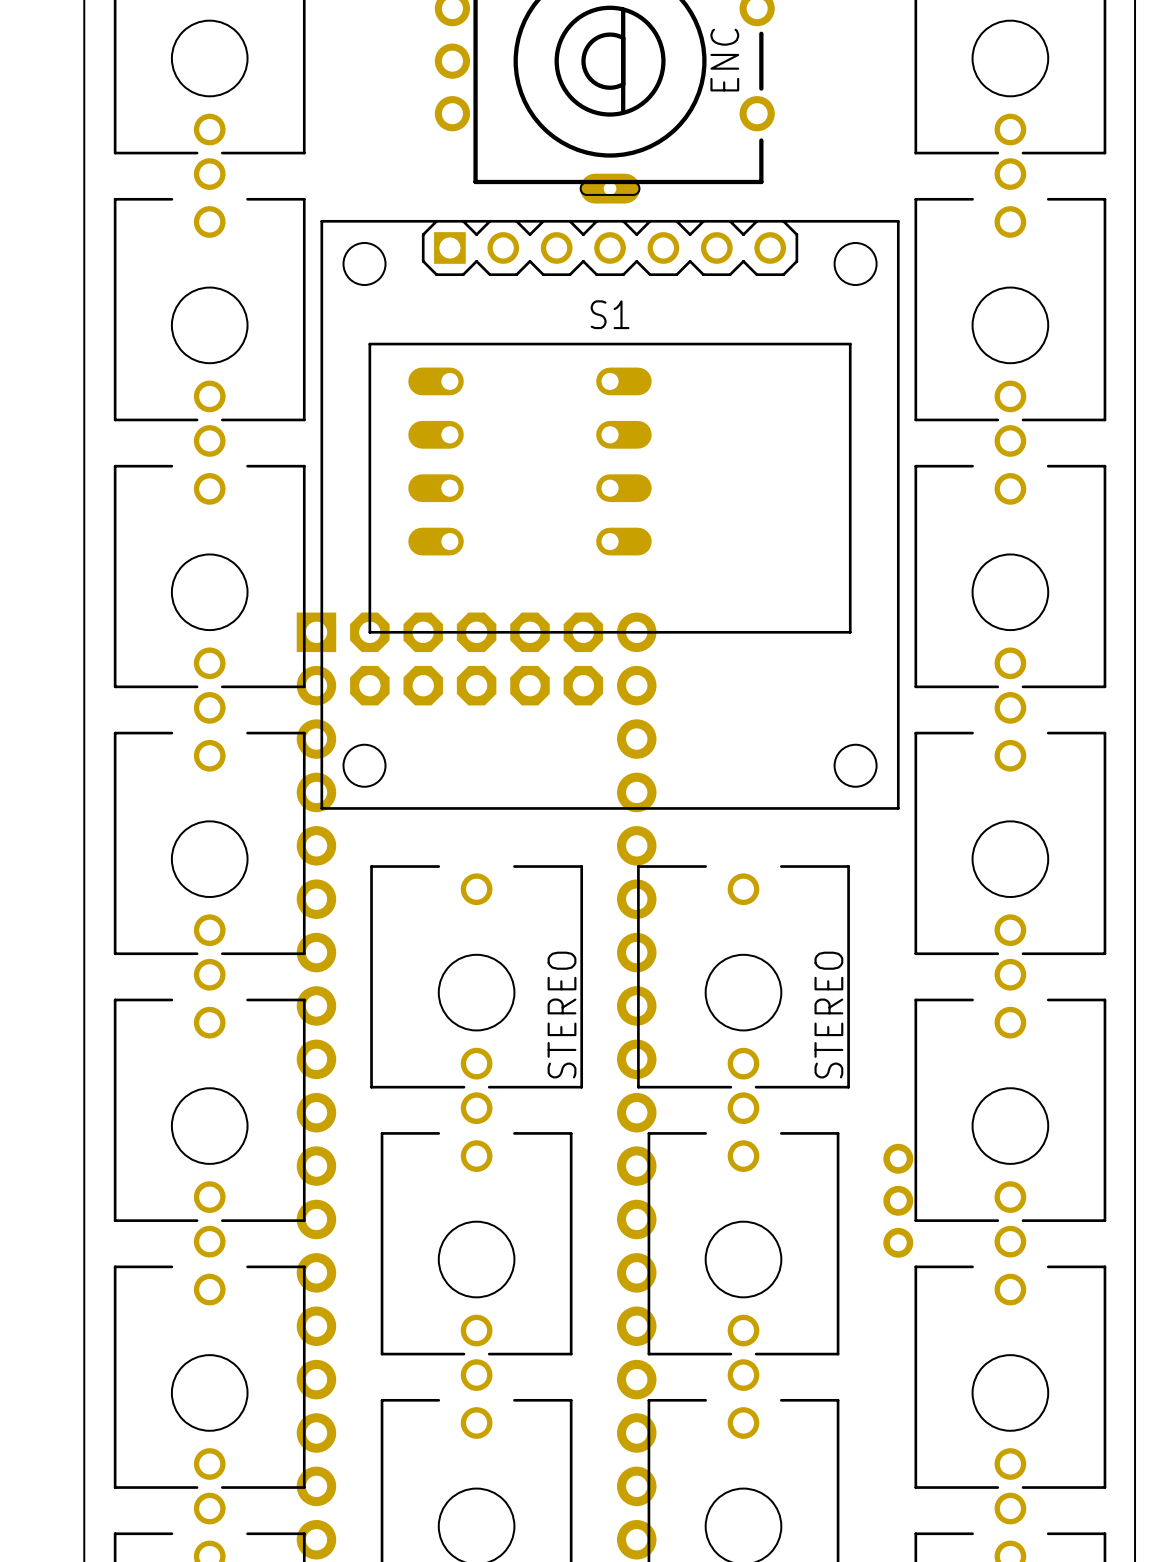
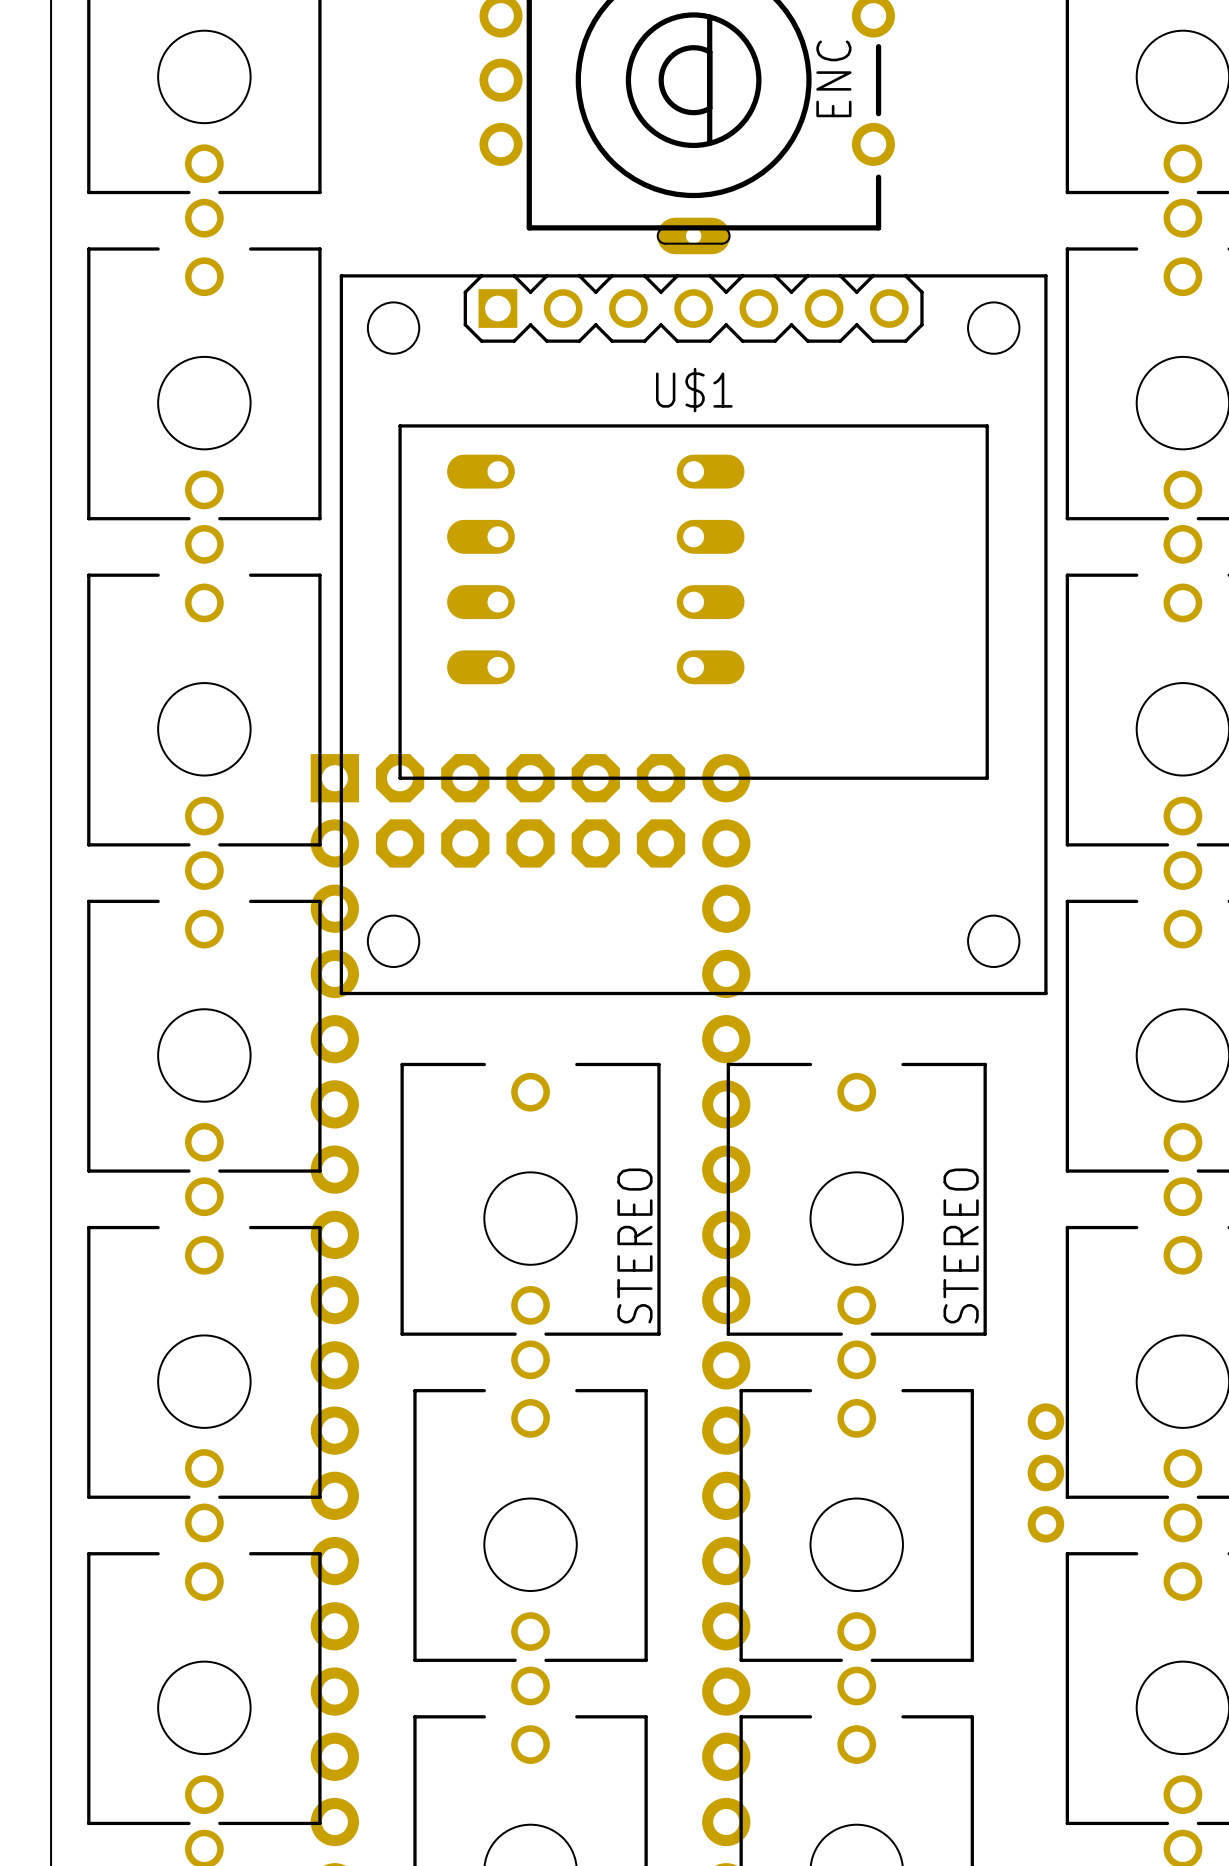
S1 name: S1 (610, 314) -> U$1 (694, 390)

